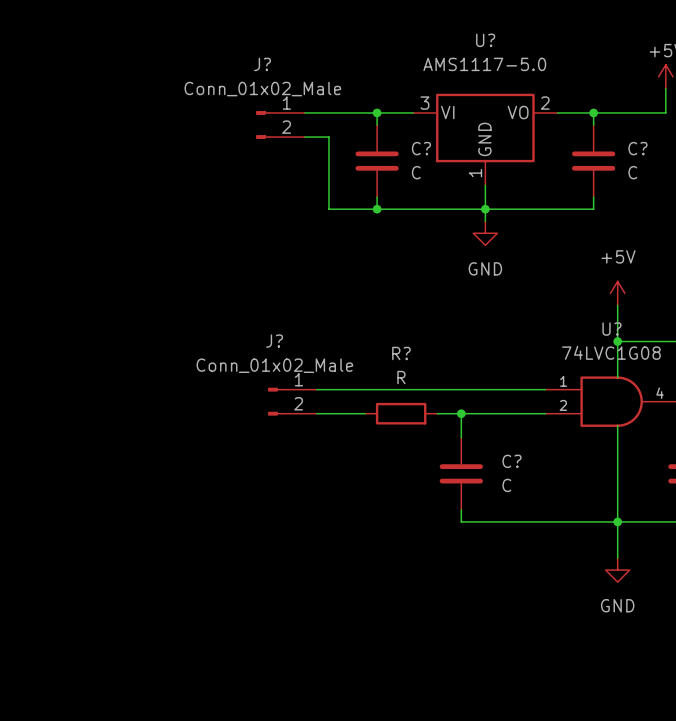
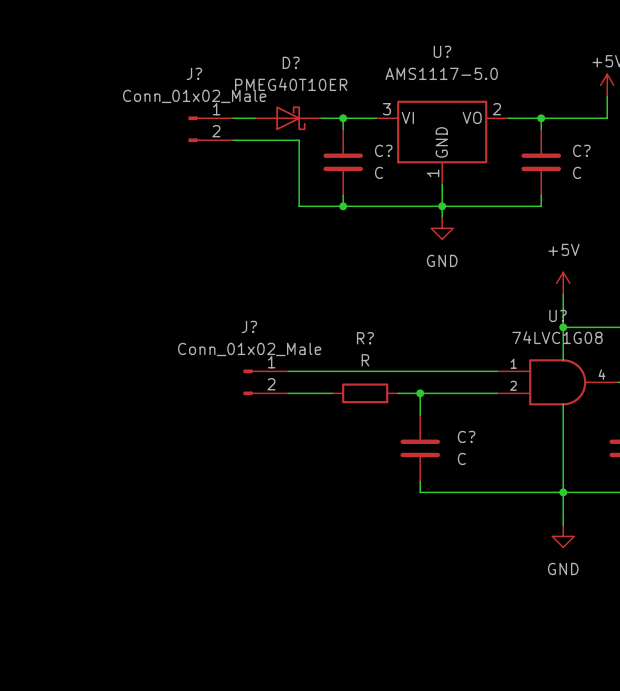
D?: none -> PMEG40T10ER (288, 118)
J? position: (280, 125) -> (210, 129)

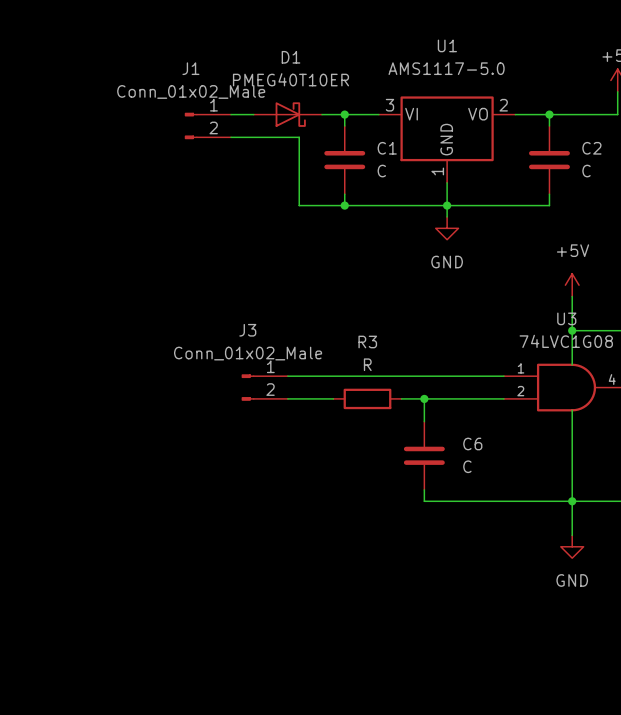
U? name: U? (442, 51) -> U1 (447, 45)
D? name: D? (291, 62) -> D1 (290, 57)
J? name: J? (194, 73) -> J1 (190, 68)
C? name: C? (383, 150) -> C1 (387, 148)
C? name: C? (581, 150) -> C2 (591, 148)
U? name: U? (558, 315) -> U3 (566, 318)
J? name: J? (249, 326) -> J3 (247, 330)
R? name: R? (365, 338) -> R3 (367, 341)
C? name: C? (466, 436) -> C6 (472, 444)

